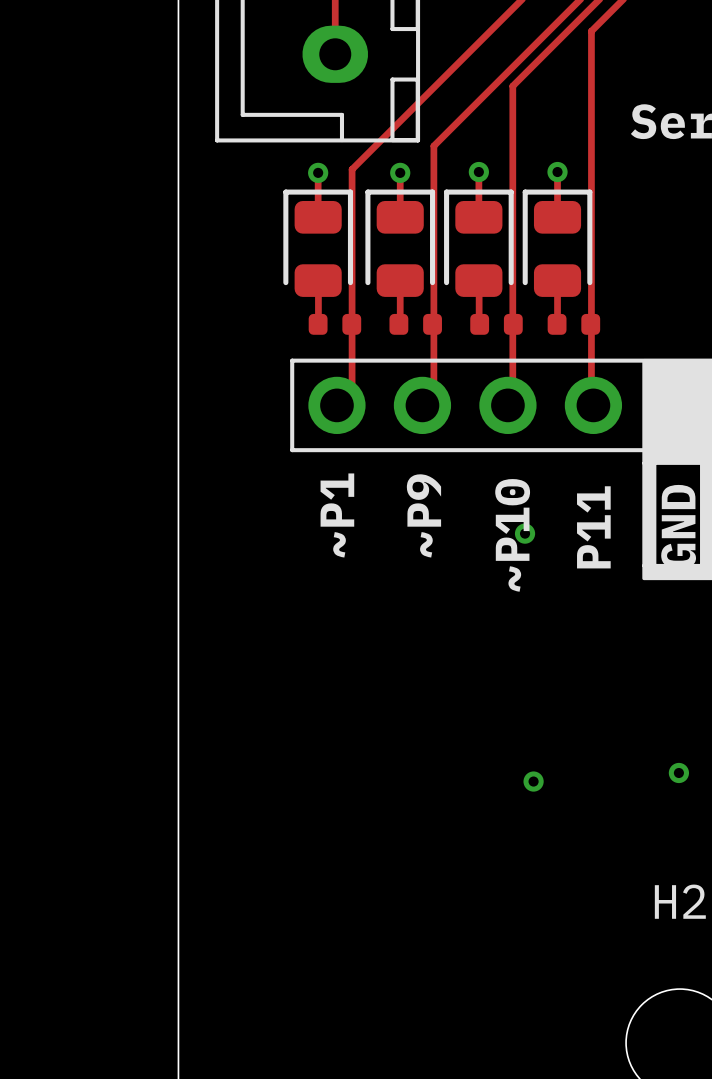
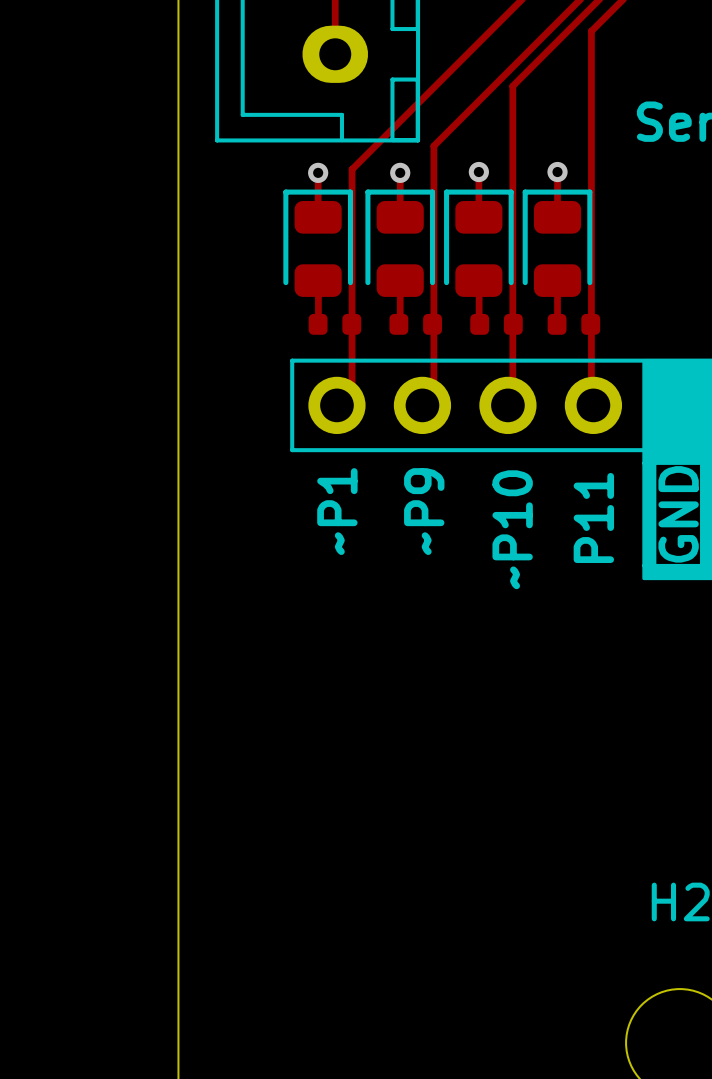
via: (525, 533) -> none
via: (678, 772) -> none
via: (533, 781) -> none

